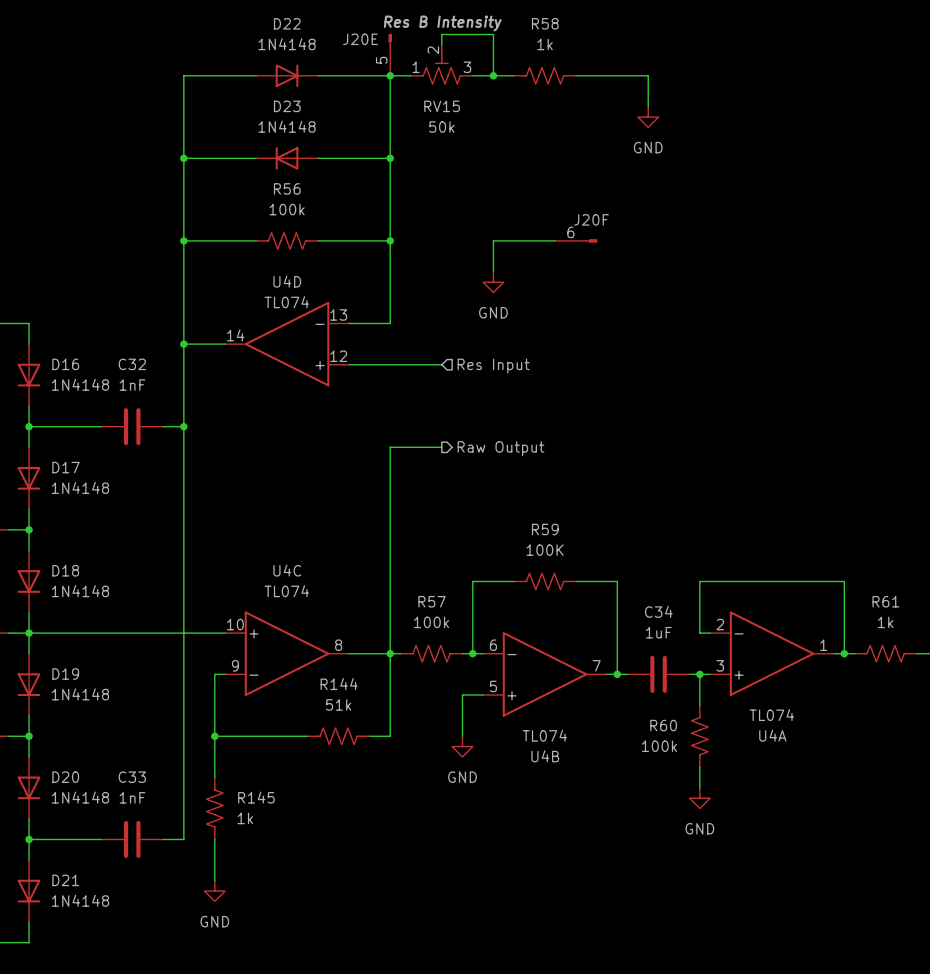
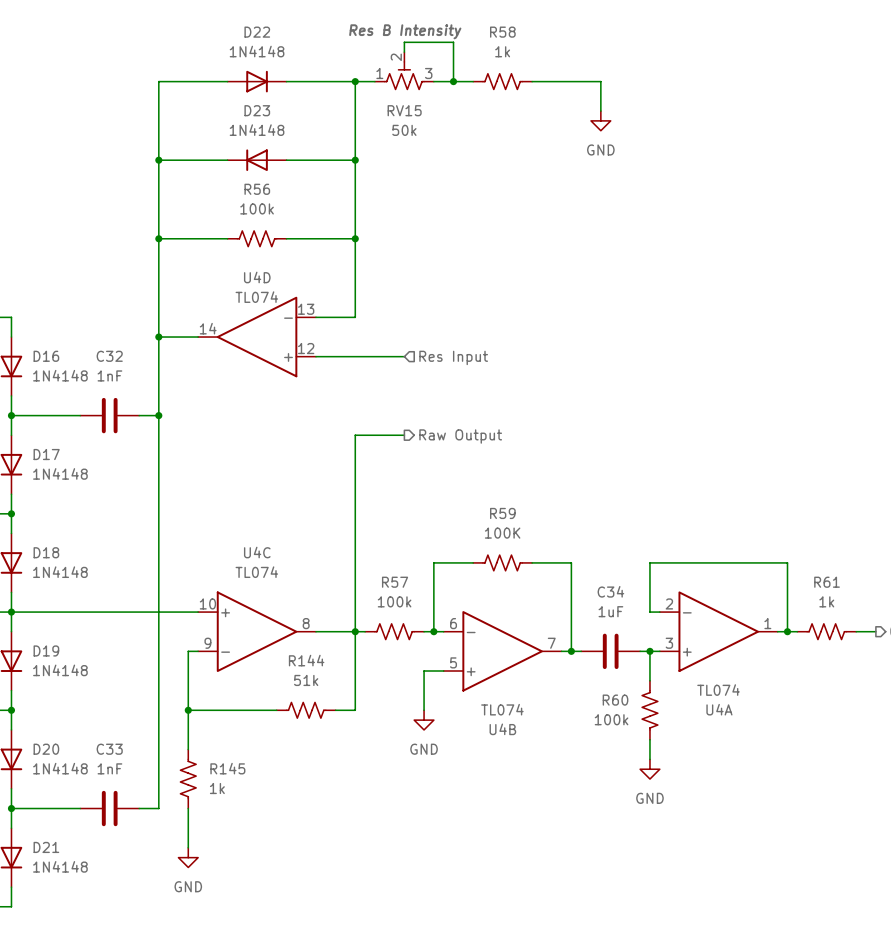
J20E: (390, 54) -> none
wire: (555, 240) (493, 240) (493, 271) -> none
J20F: (576, 240) -> none
power symbol: GND (493, 282) -> none

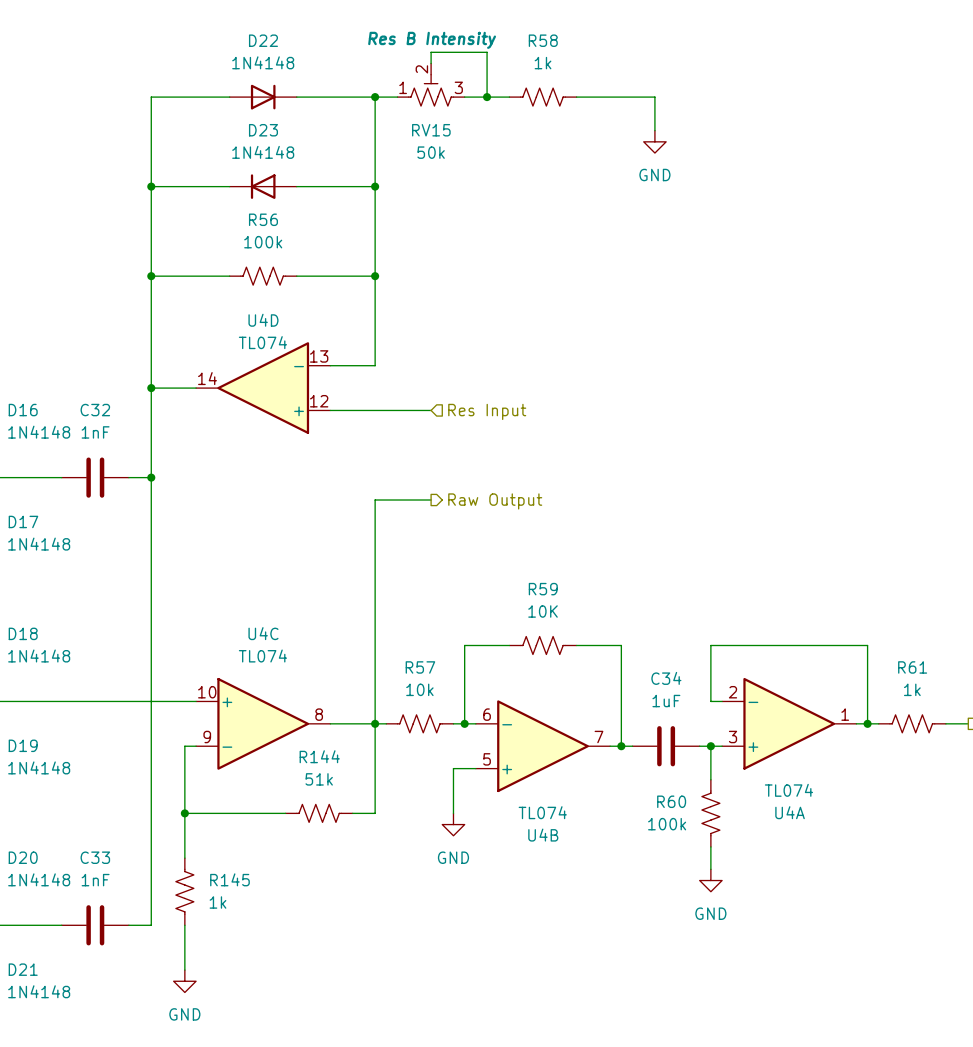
R59 value: 100K (502, 533) -> 10K (543, 611)
R57 value: 100k (394, 601) -> 10k (419, 689)

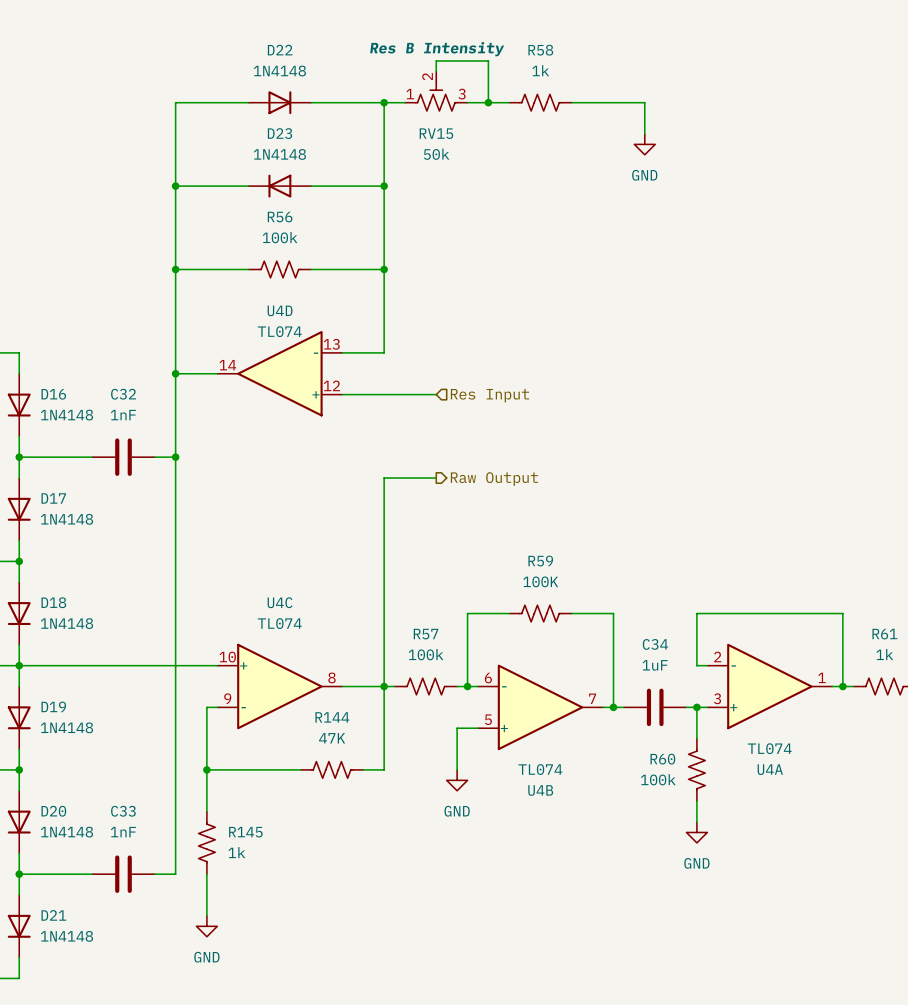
R59 value: 10K (543, 611) -> 100K (540, 581)
R57 value: 10k (419, 689) -> 100k (426, 654)
R144 value: 51k (319, 779) -> 47K (332, 738)

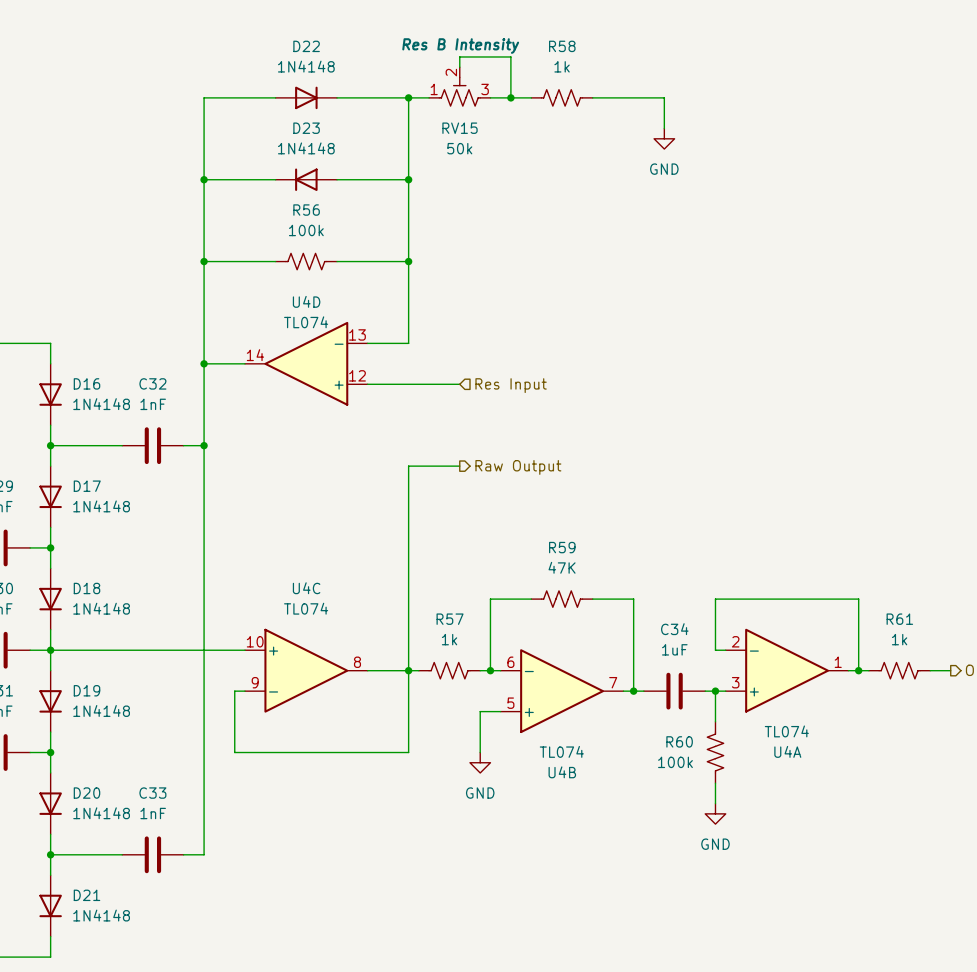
R59 value: 100K (540, 581) -> 47K (562, 567)
R57 value: 100k (426, 654) -> 1k (449, 639)
wire: (206, 769) (206, 811) -> none
junction: (206, 769) -> none
R144: 47K (332, 769) -> none
R145: 1k (206, 842) -> none
wire: (206, 874) (206, 915) -> none
power symbol: GND (206, 926) -> none

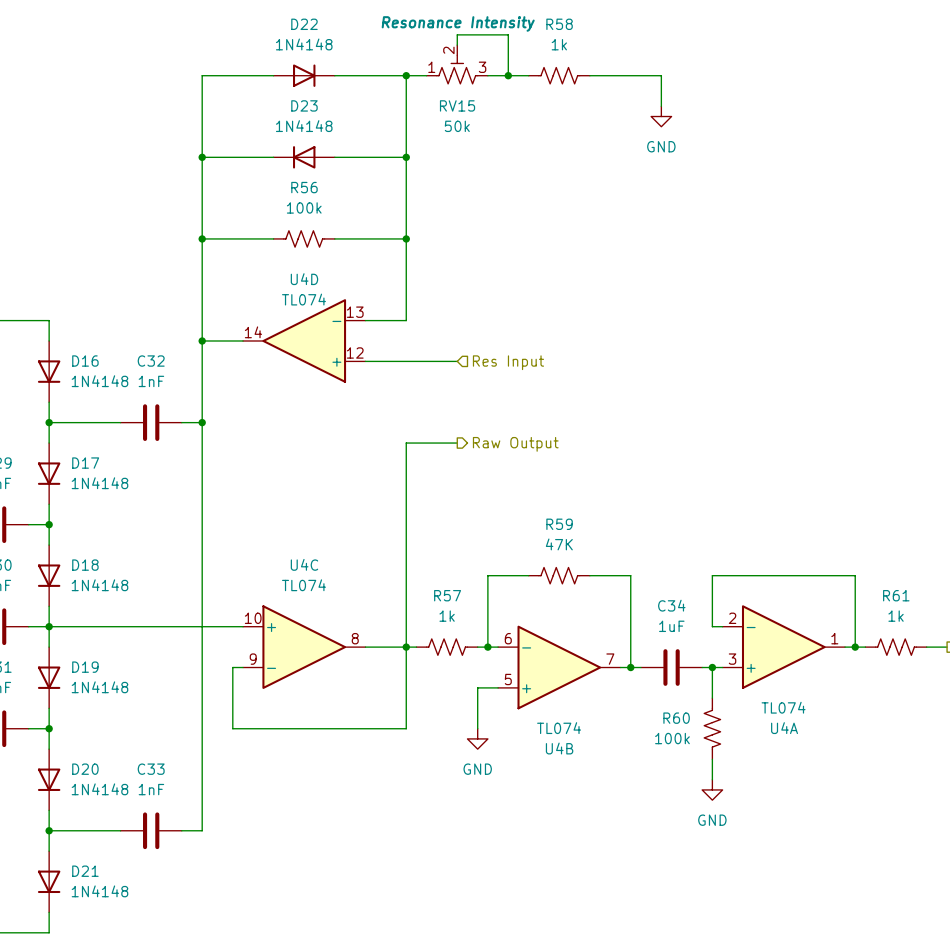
RV15 text: Res B Intensity (460, 46) -> Resonance Intensity (458, 23)

